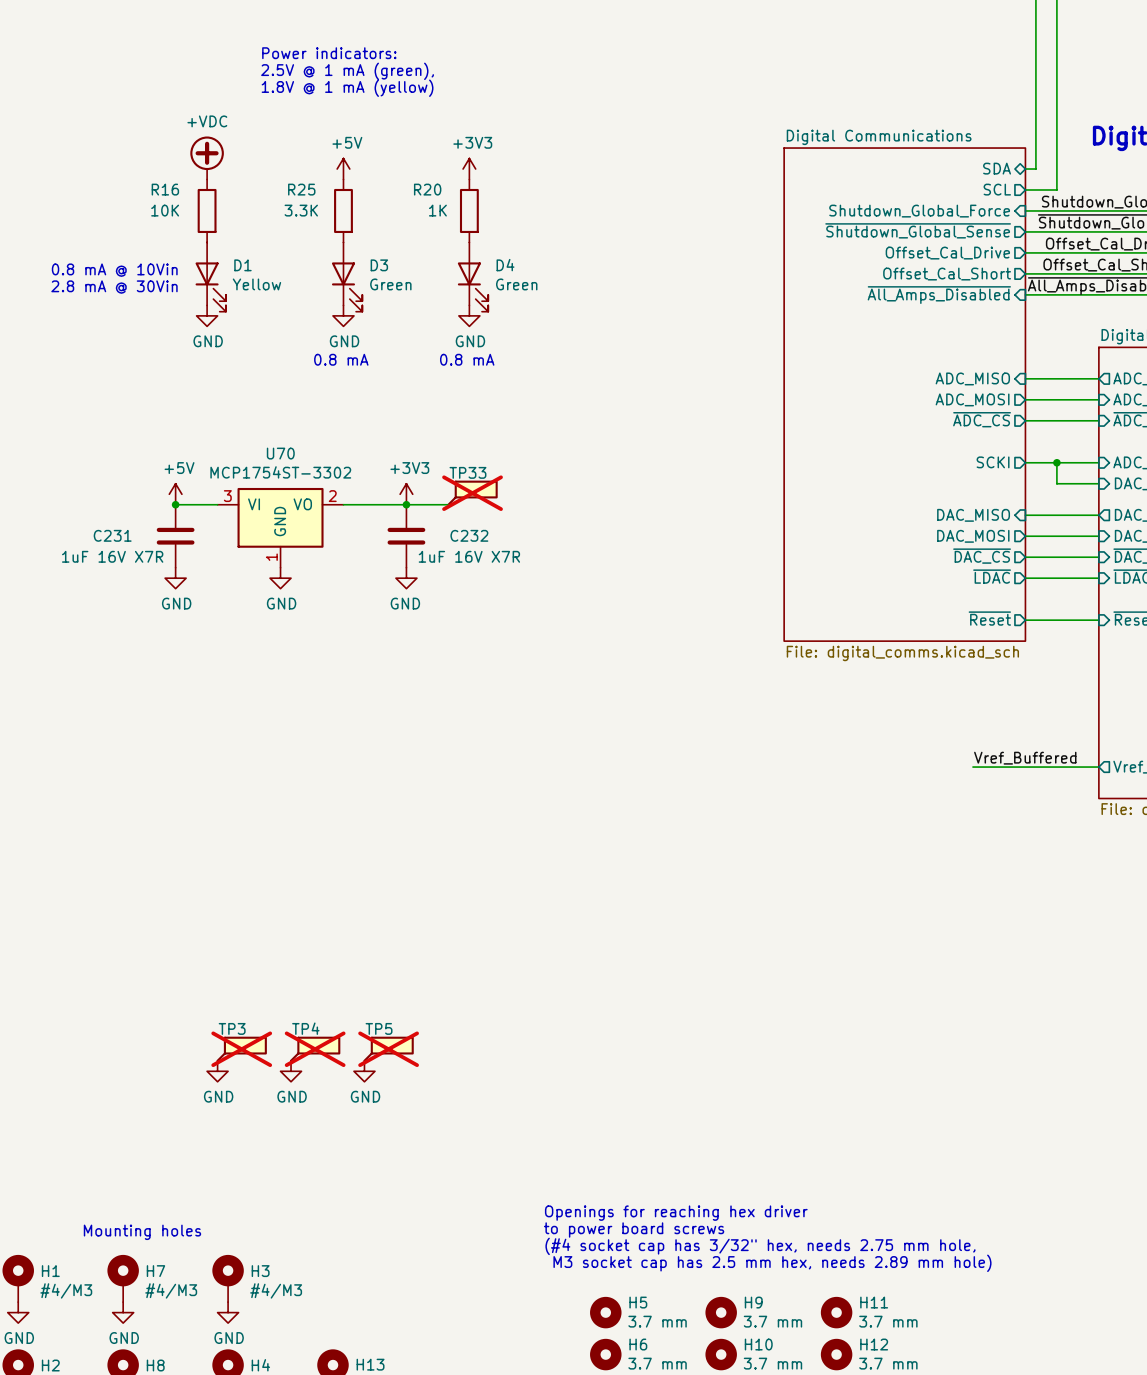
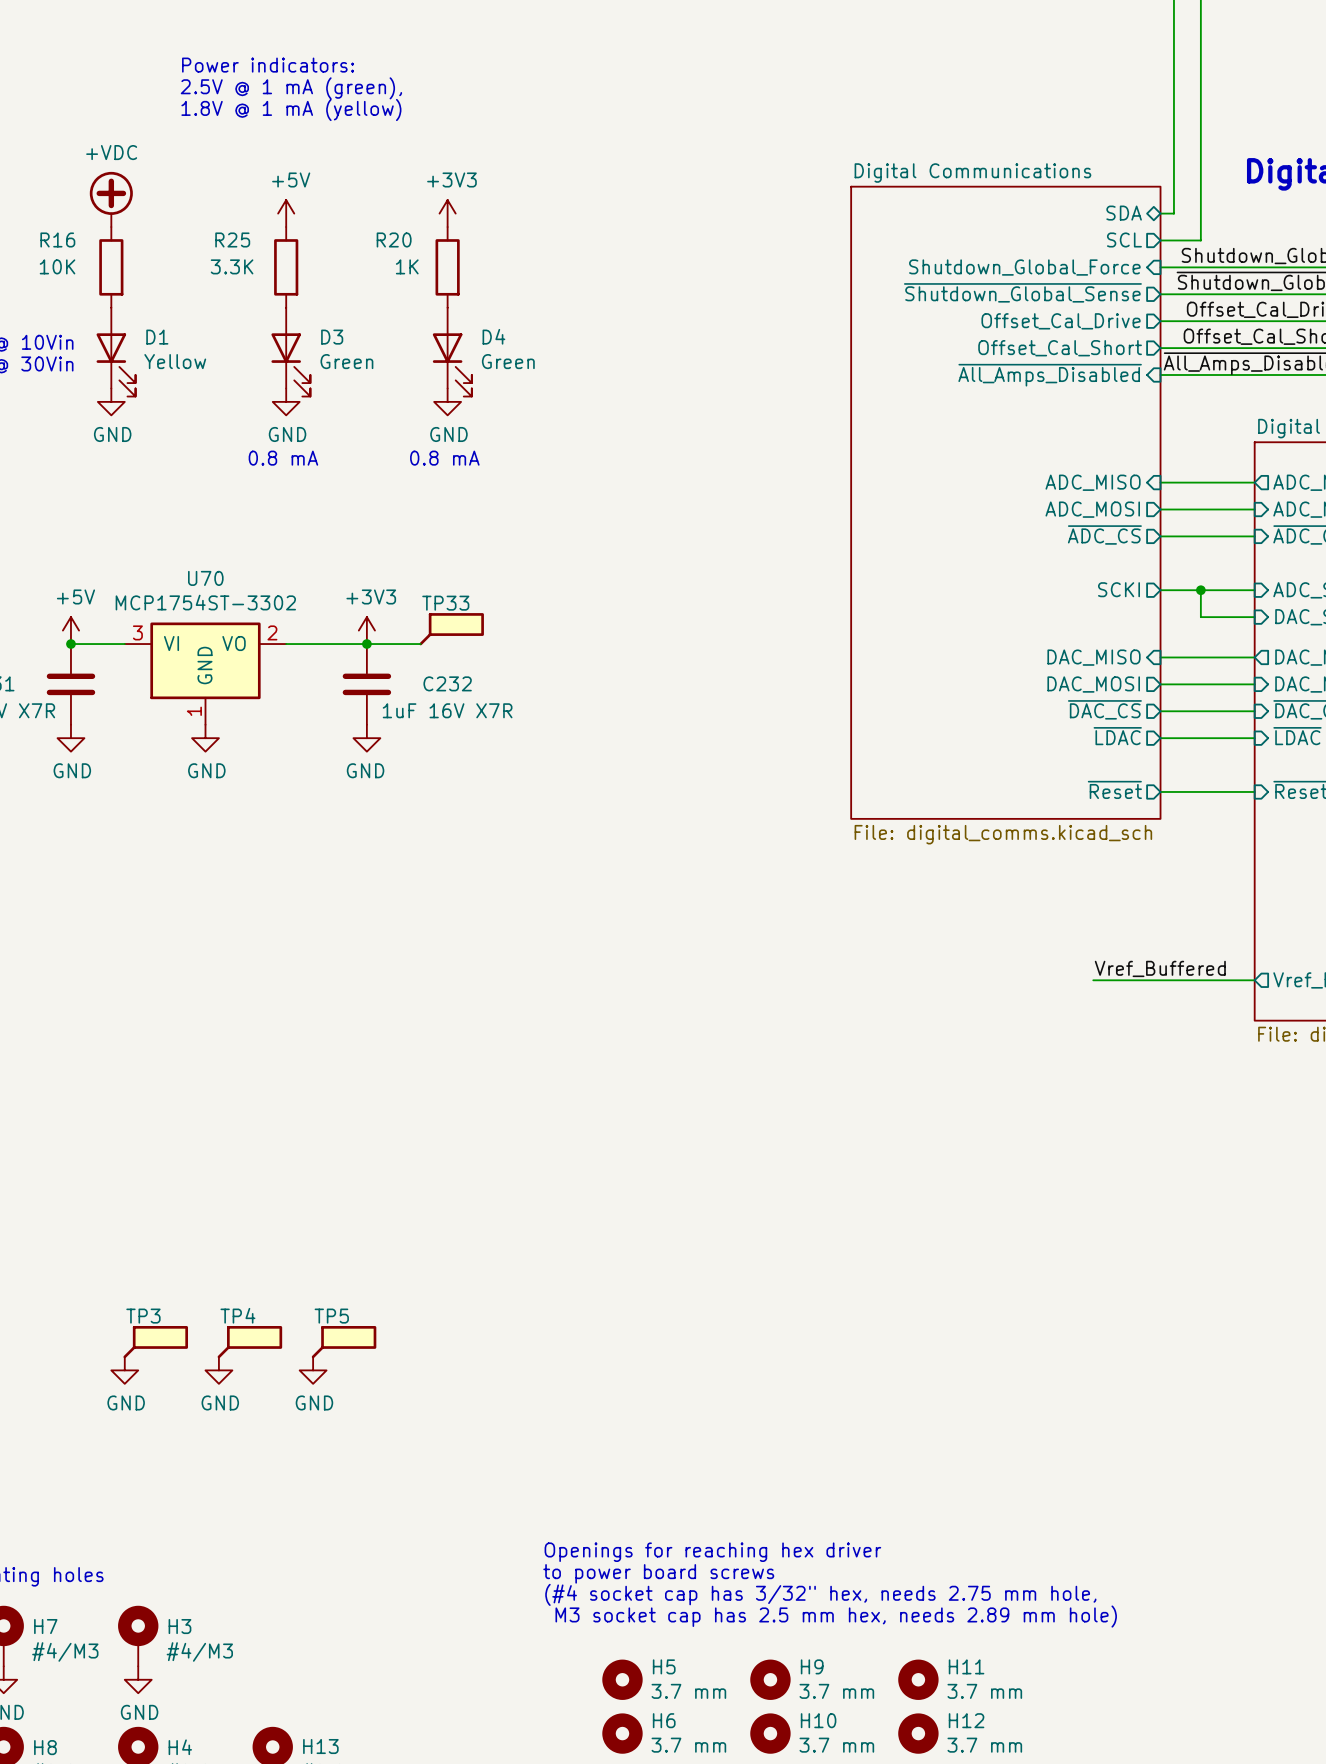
TP33 do-not-place cross: (472, 493) -> none
TP3 do-not-place cross: (241, 1049) -> none
TP4 do-not-place cross: (315, 1049) -> none
TP5 do-not-place cross: (388, 1049) -> none

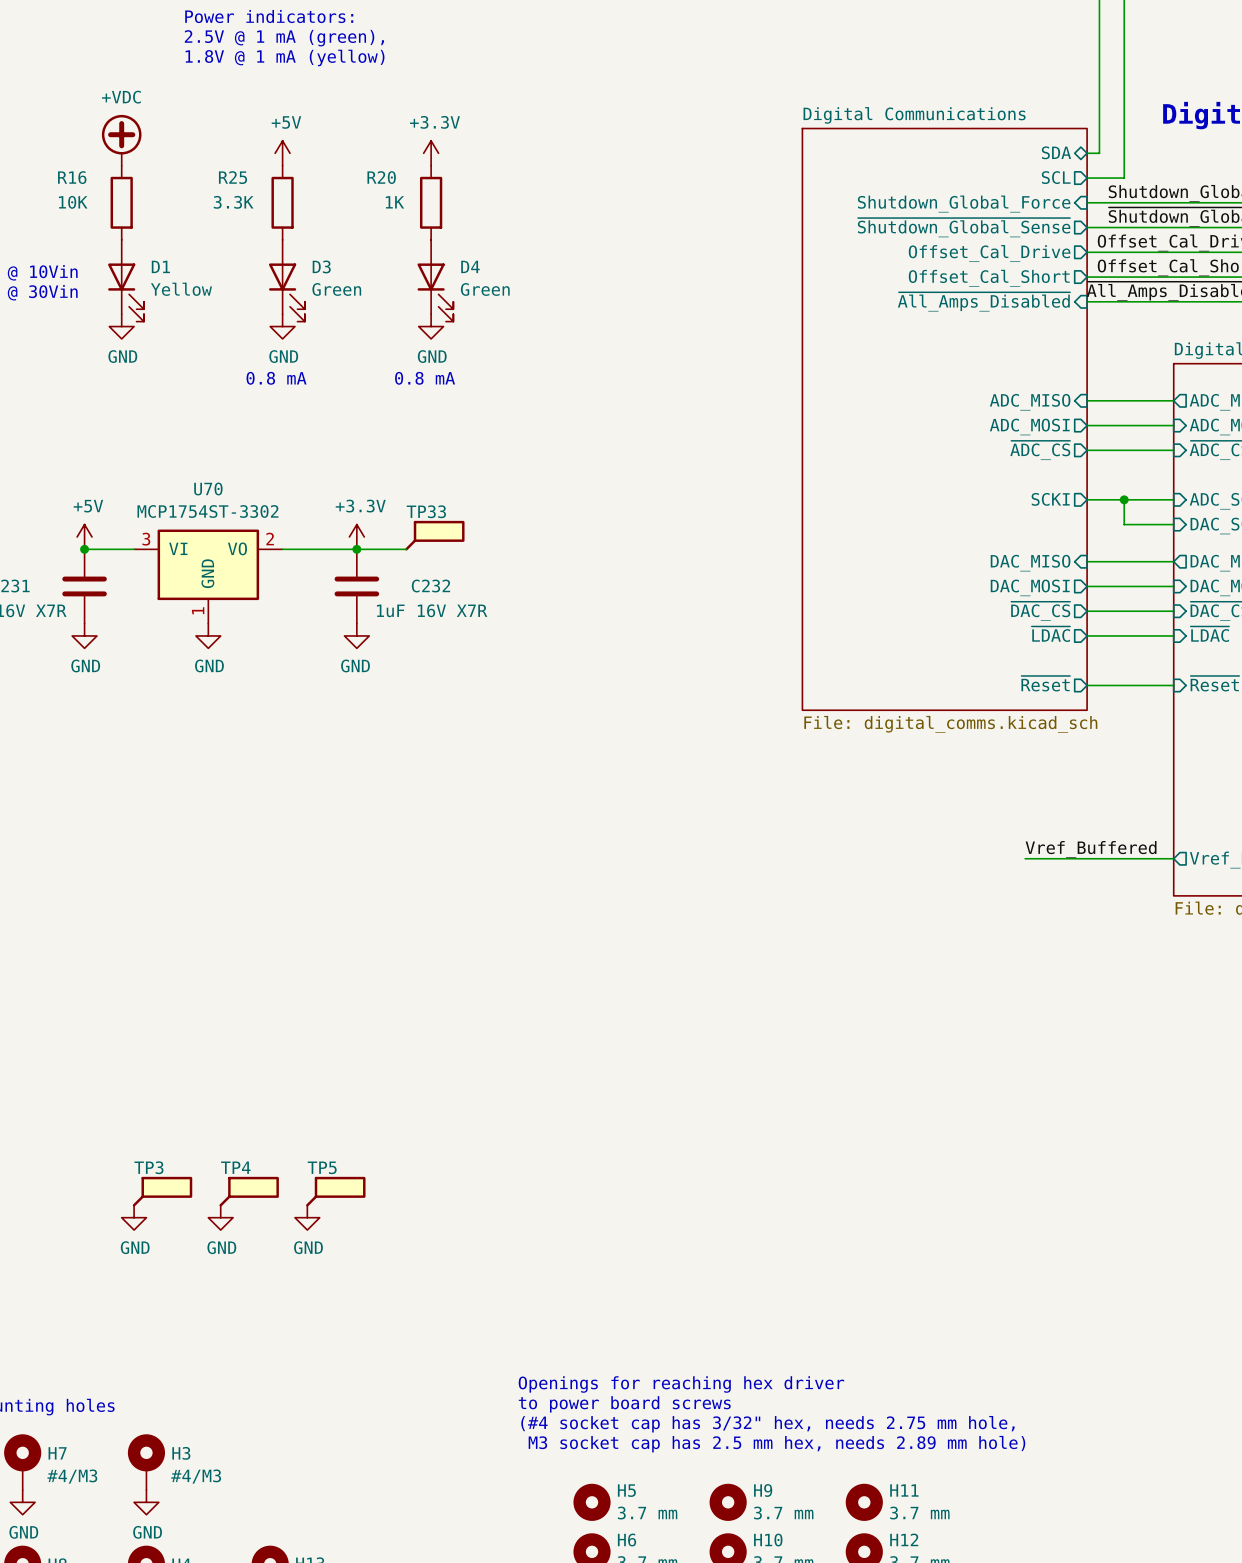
power symbol: +3V3 (447, 213) -> +3.3V (431, 153)
power symbol: +3V3 (366, 630) -> +3.3V (356, 536)

